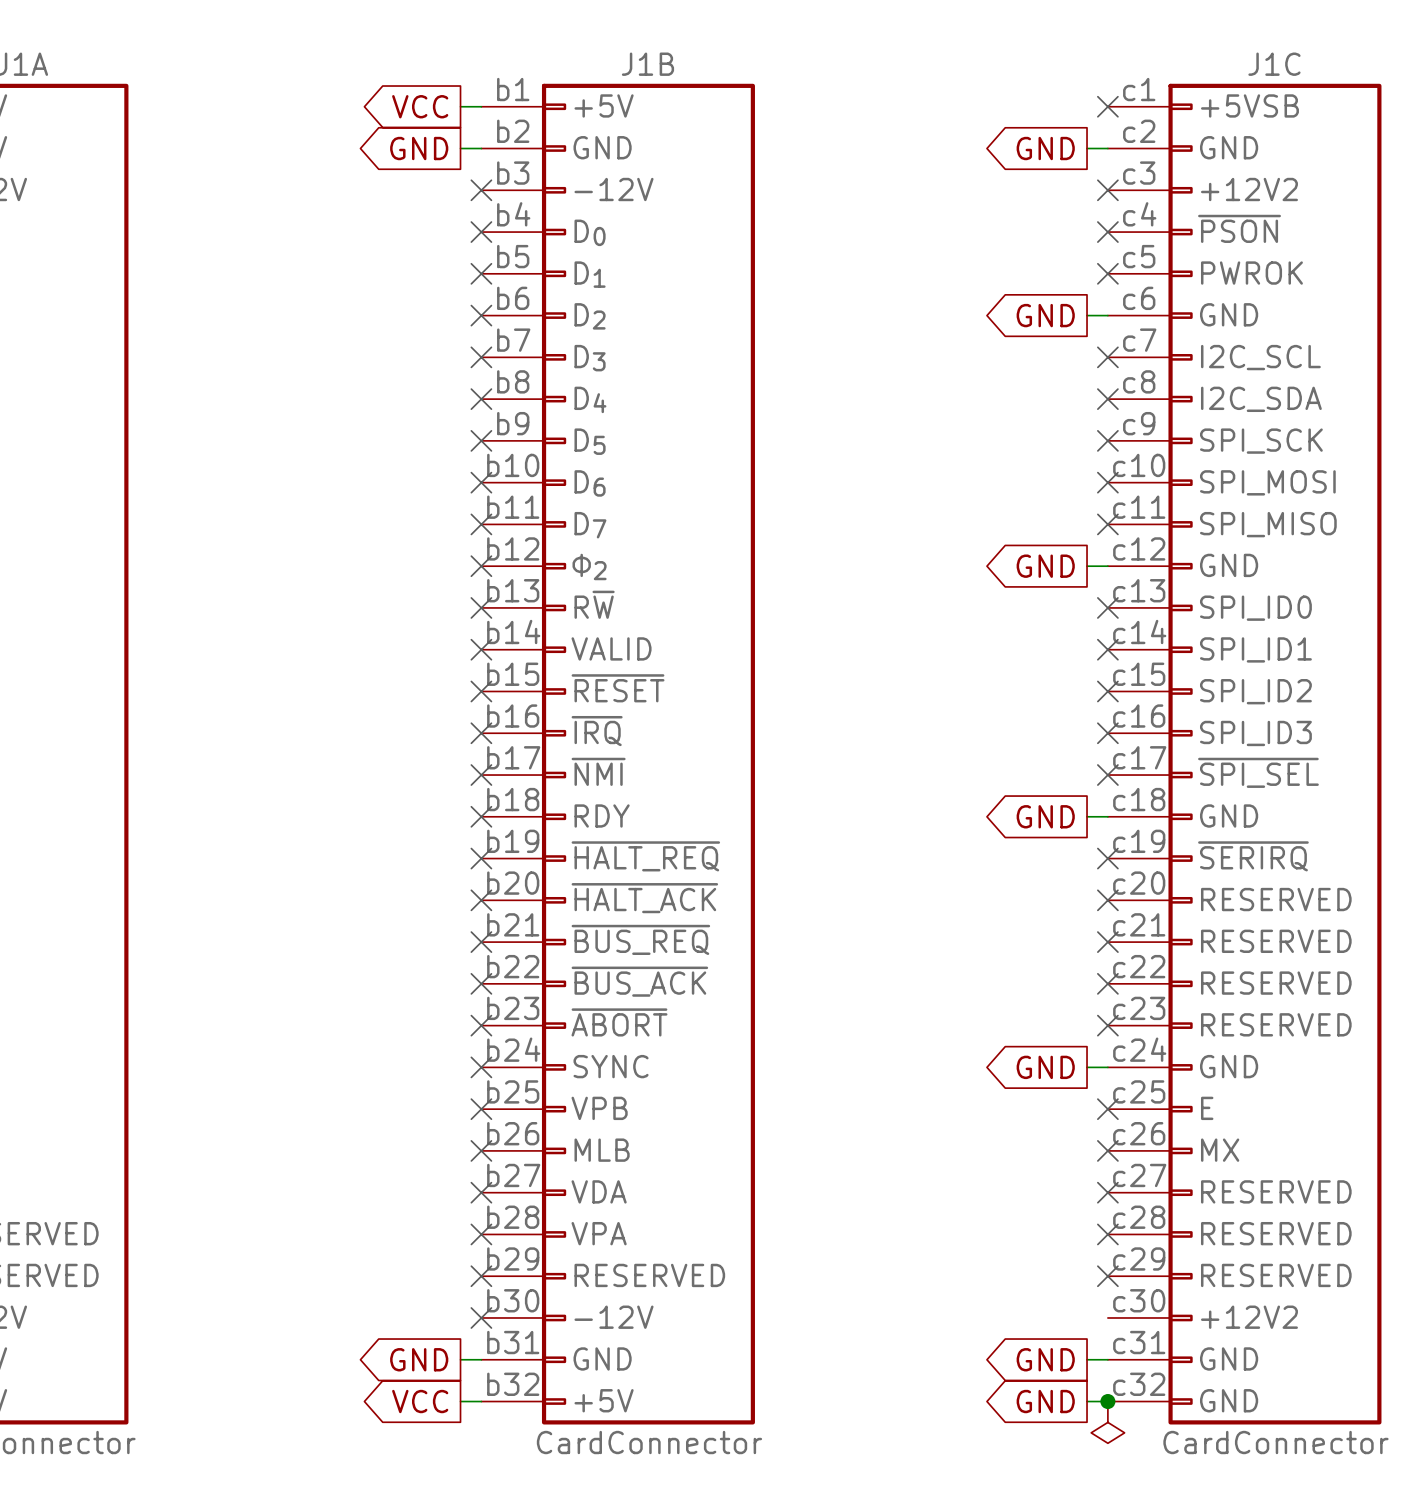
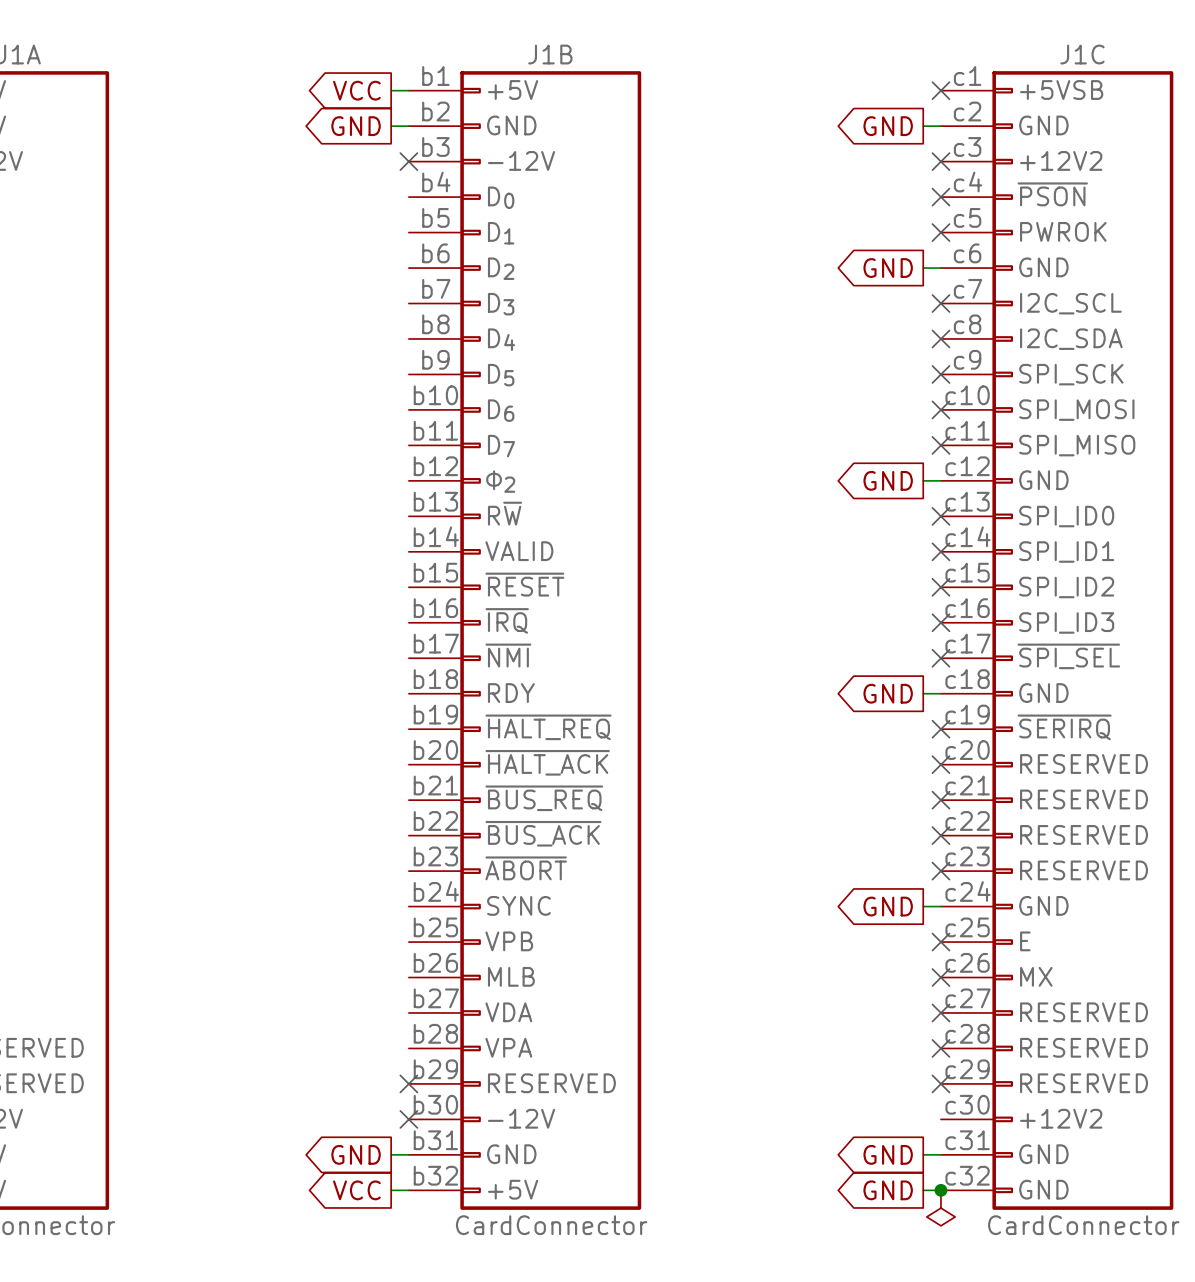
no-connect mark: (481, 232) -> none
no-connect mark: (481, 273) -> none
no-connect mark: (481, 315) -> none
no-connect mark: (481, 357) -> none
no-connect mark: (481, 399) -> none
no-connect mark: (481, 440) -> none
no-connect mark: (481, 482) -> none
no-connect mark: (481, 524) -> none
no-connect mark: (481, 566) -> none
no-connect mark: (481, 607) -> none
no-connect mark: (481, 649) -> none
no-connect mark: (481, 691) -> none
no-connect mark: (481, 733) -> none
no-connect mark: (481, 775) -> none
no-connect mark: (481, 816) -> none
no-connect mark: (481, 858) -> none
no-connect mark: (481, 900) -> none
no-connect mark: (481, 942) -> none
no-connect mark: (481, 983) -> none
no-connect mark: (481, 1025) -> none
no-connect mark: (481, 1067) -> none
no-connect mark: (481, 1109) -> none
no-connect mark: (481, 1150) -> none
no-connect mark: (481, 1192) -> none
no-connect mark: (481, 1234) -> none

